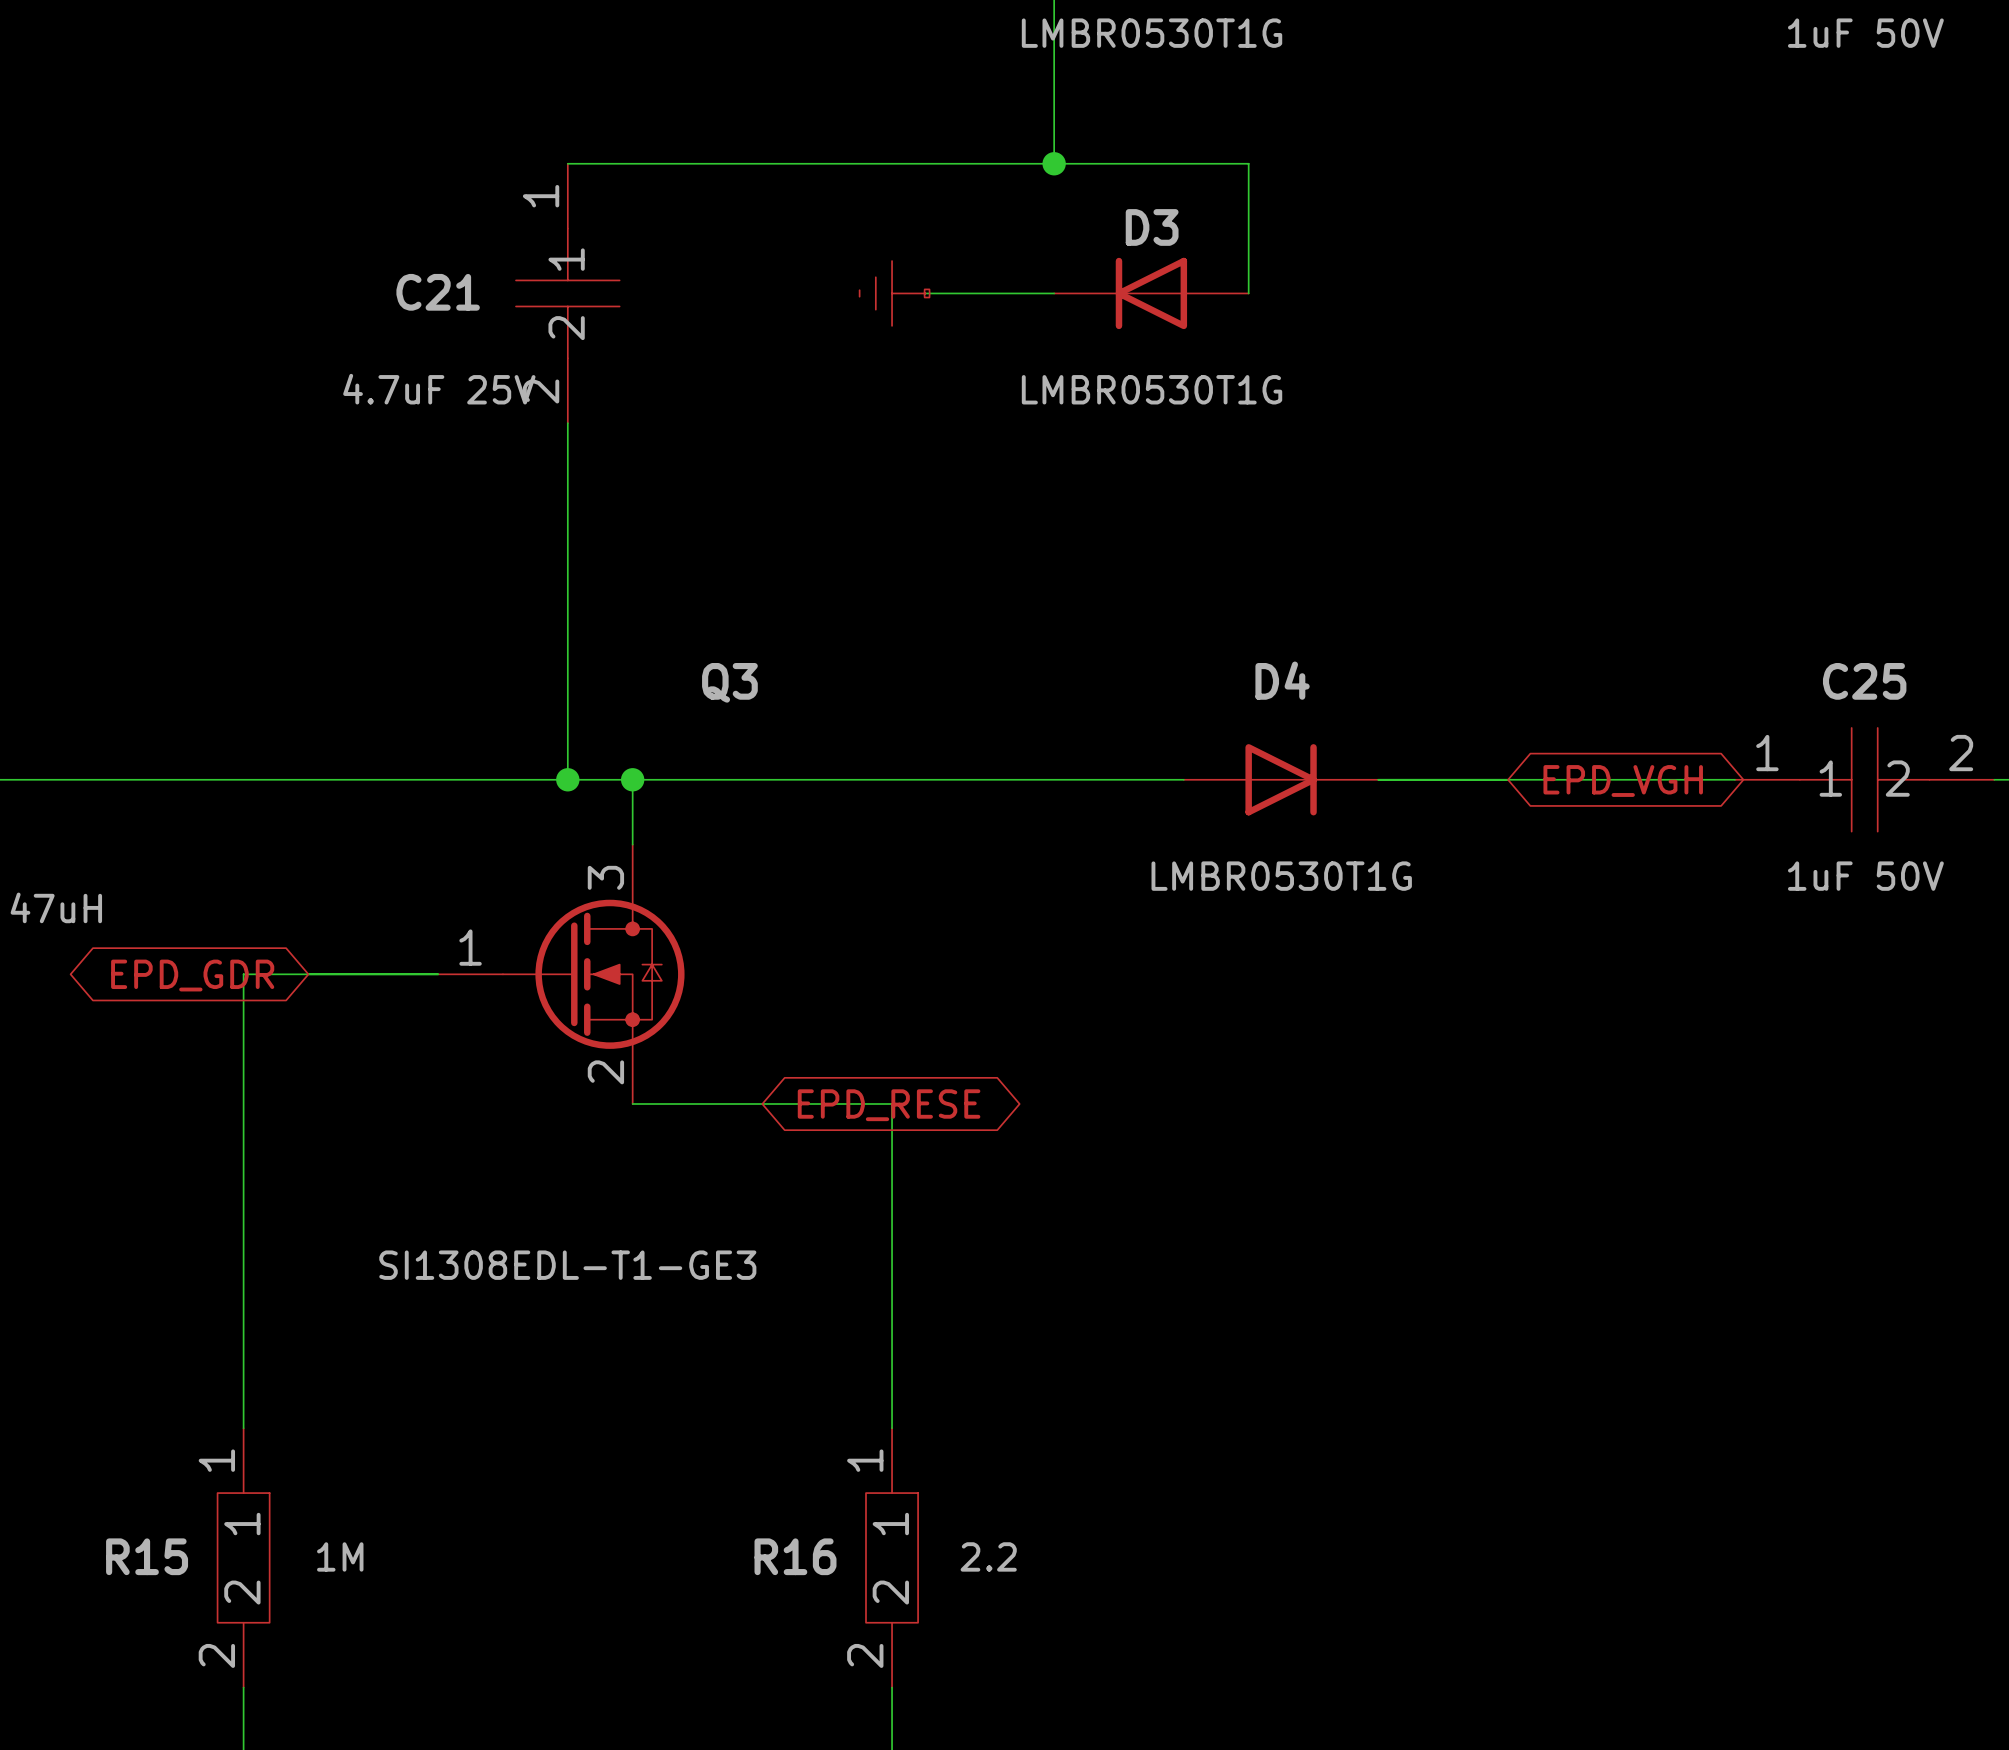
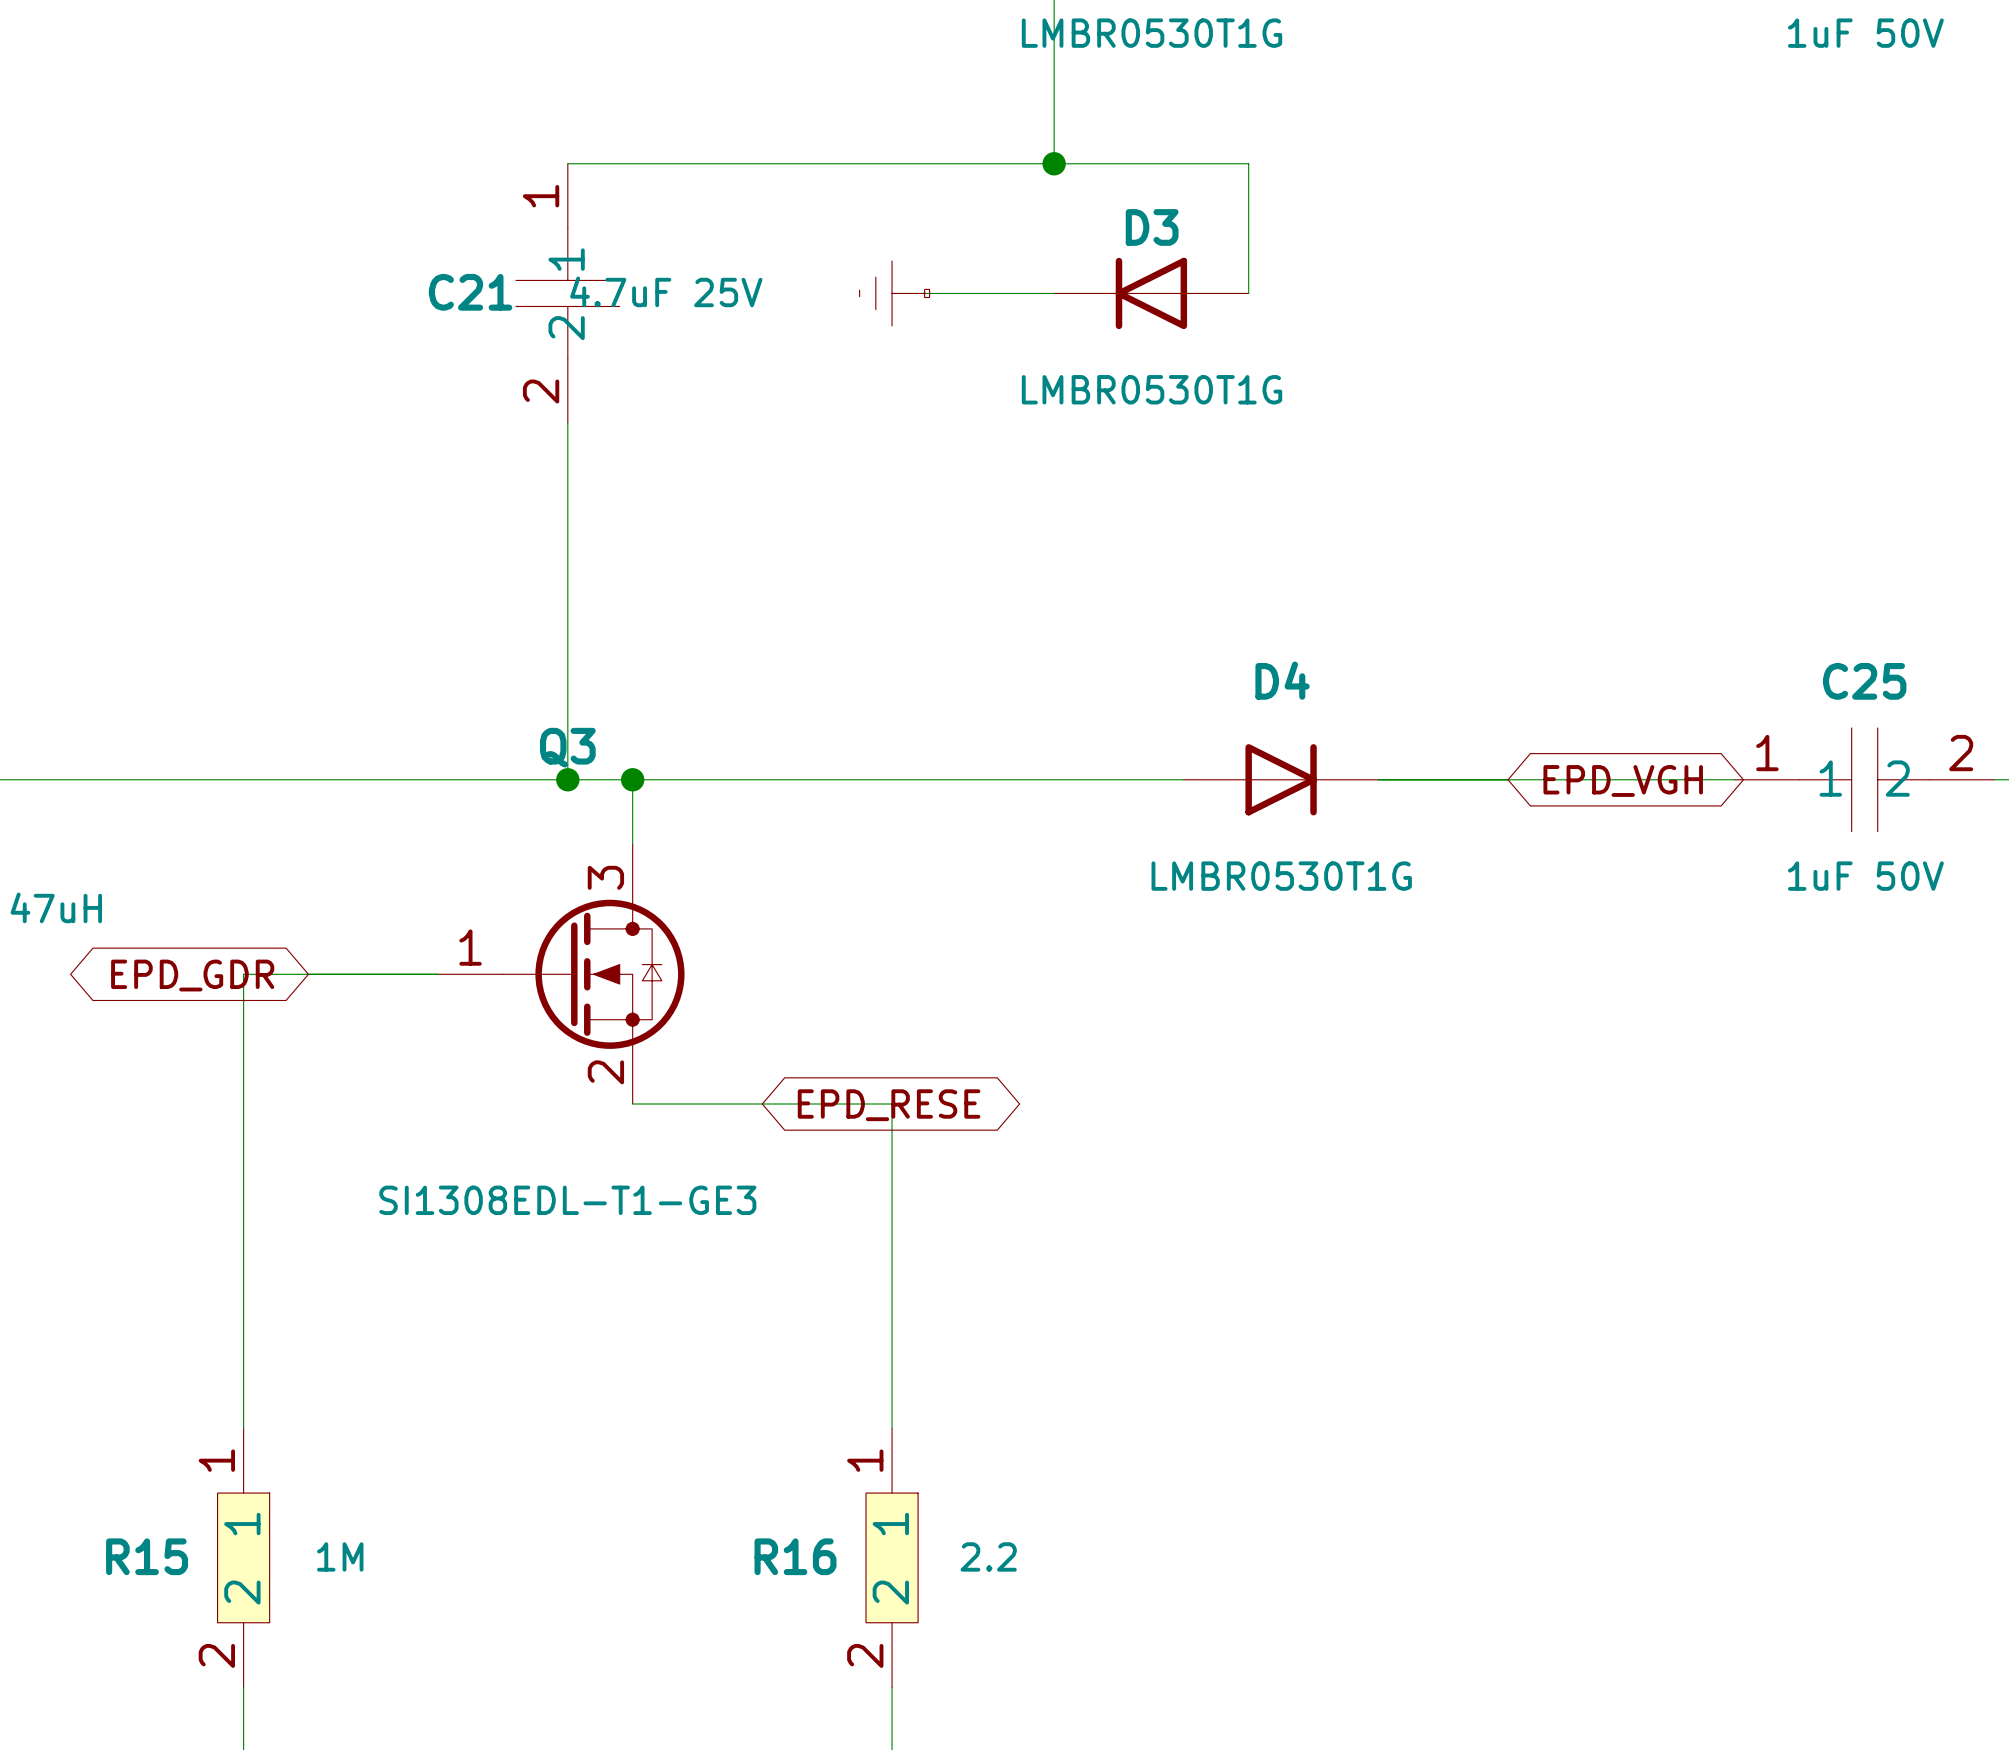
C21 name position: C21 (438, 292) -> C21 (470, 292)
C21 value position: 4.7uF 25V (439, 389) -> 4.7uF 25V (666, 291)
Q3 name position: Q3 (729, 682) -> Q3 (567, 747)
Q3 value position: SI1308EDL-T1-GE3 (567, 1265) -> SI1308EDL-T1-GE3 (567, 1200)

